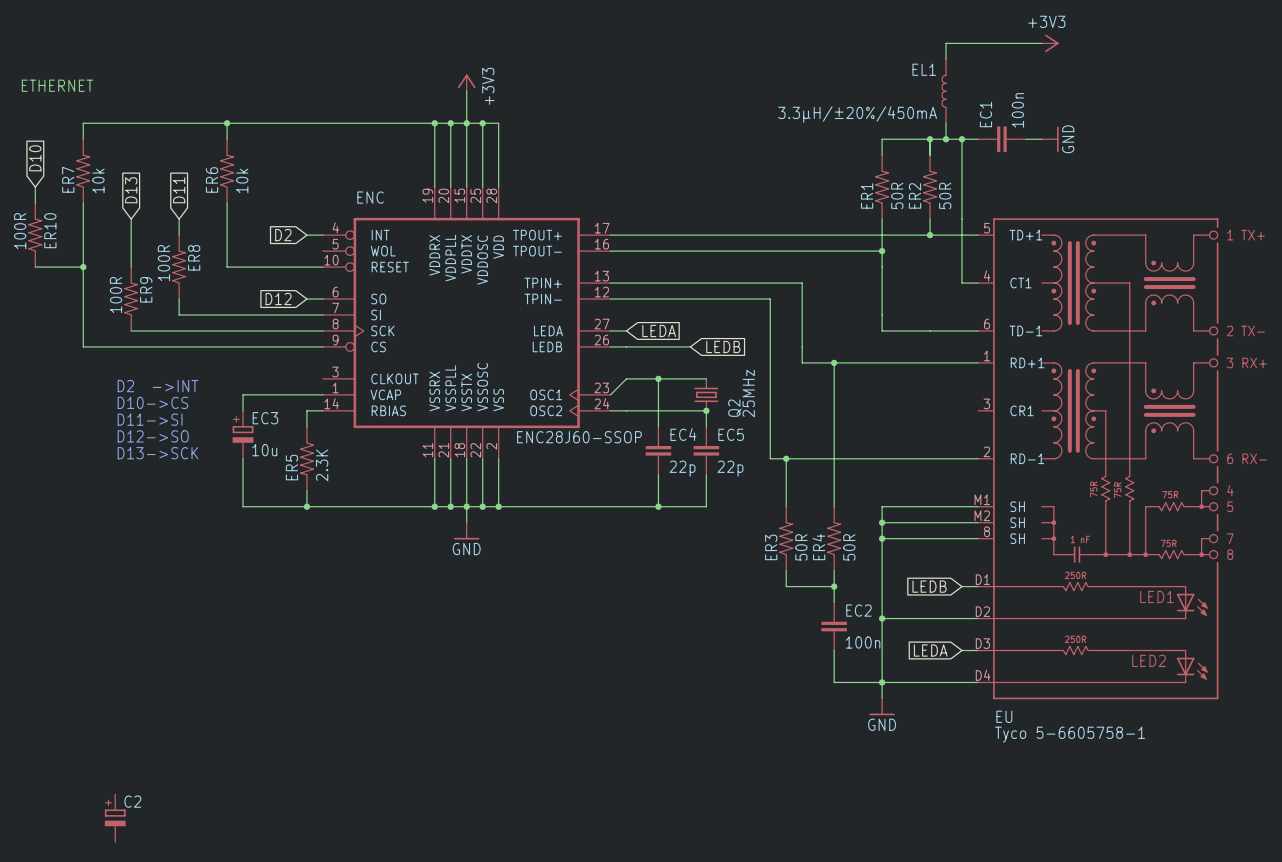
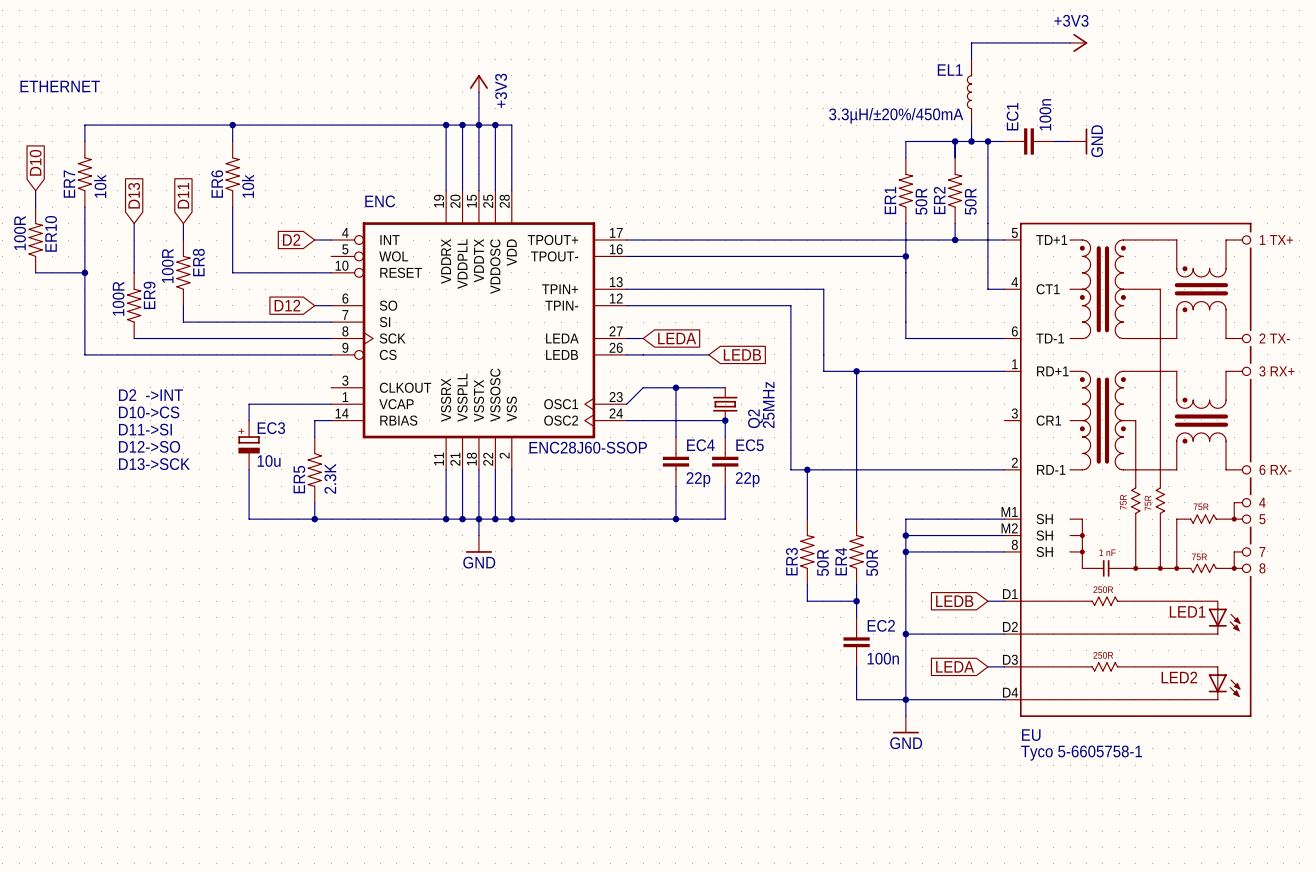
C2: (115, 818) -> none

